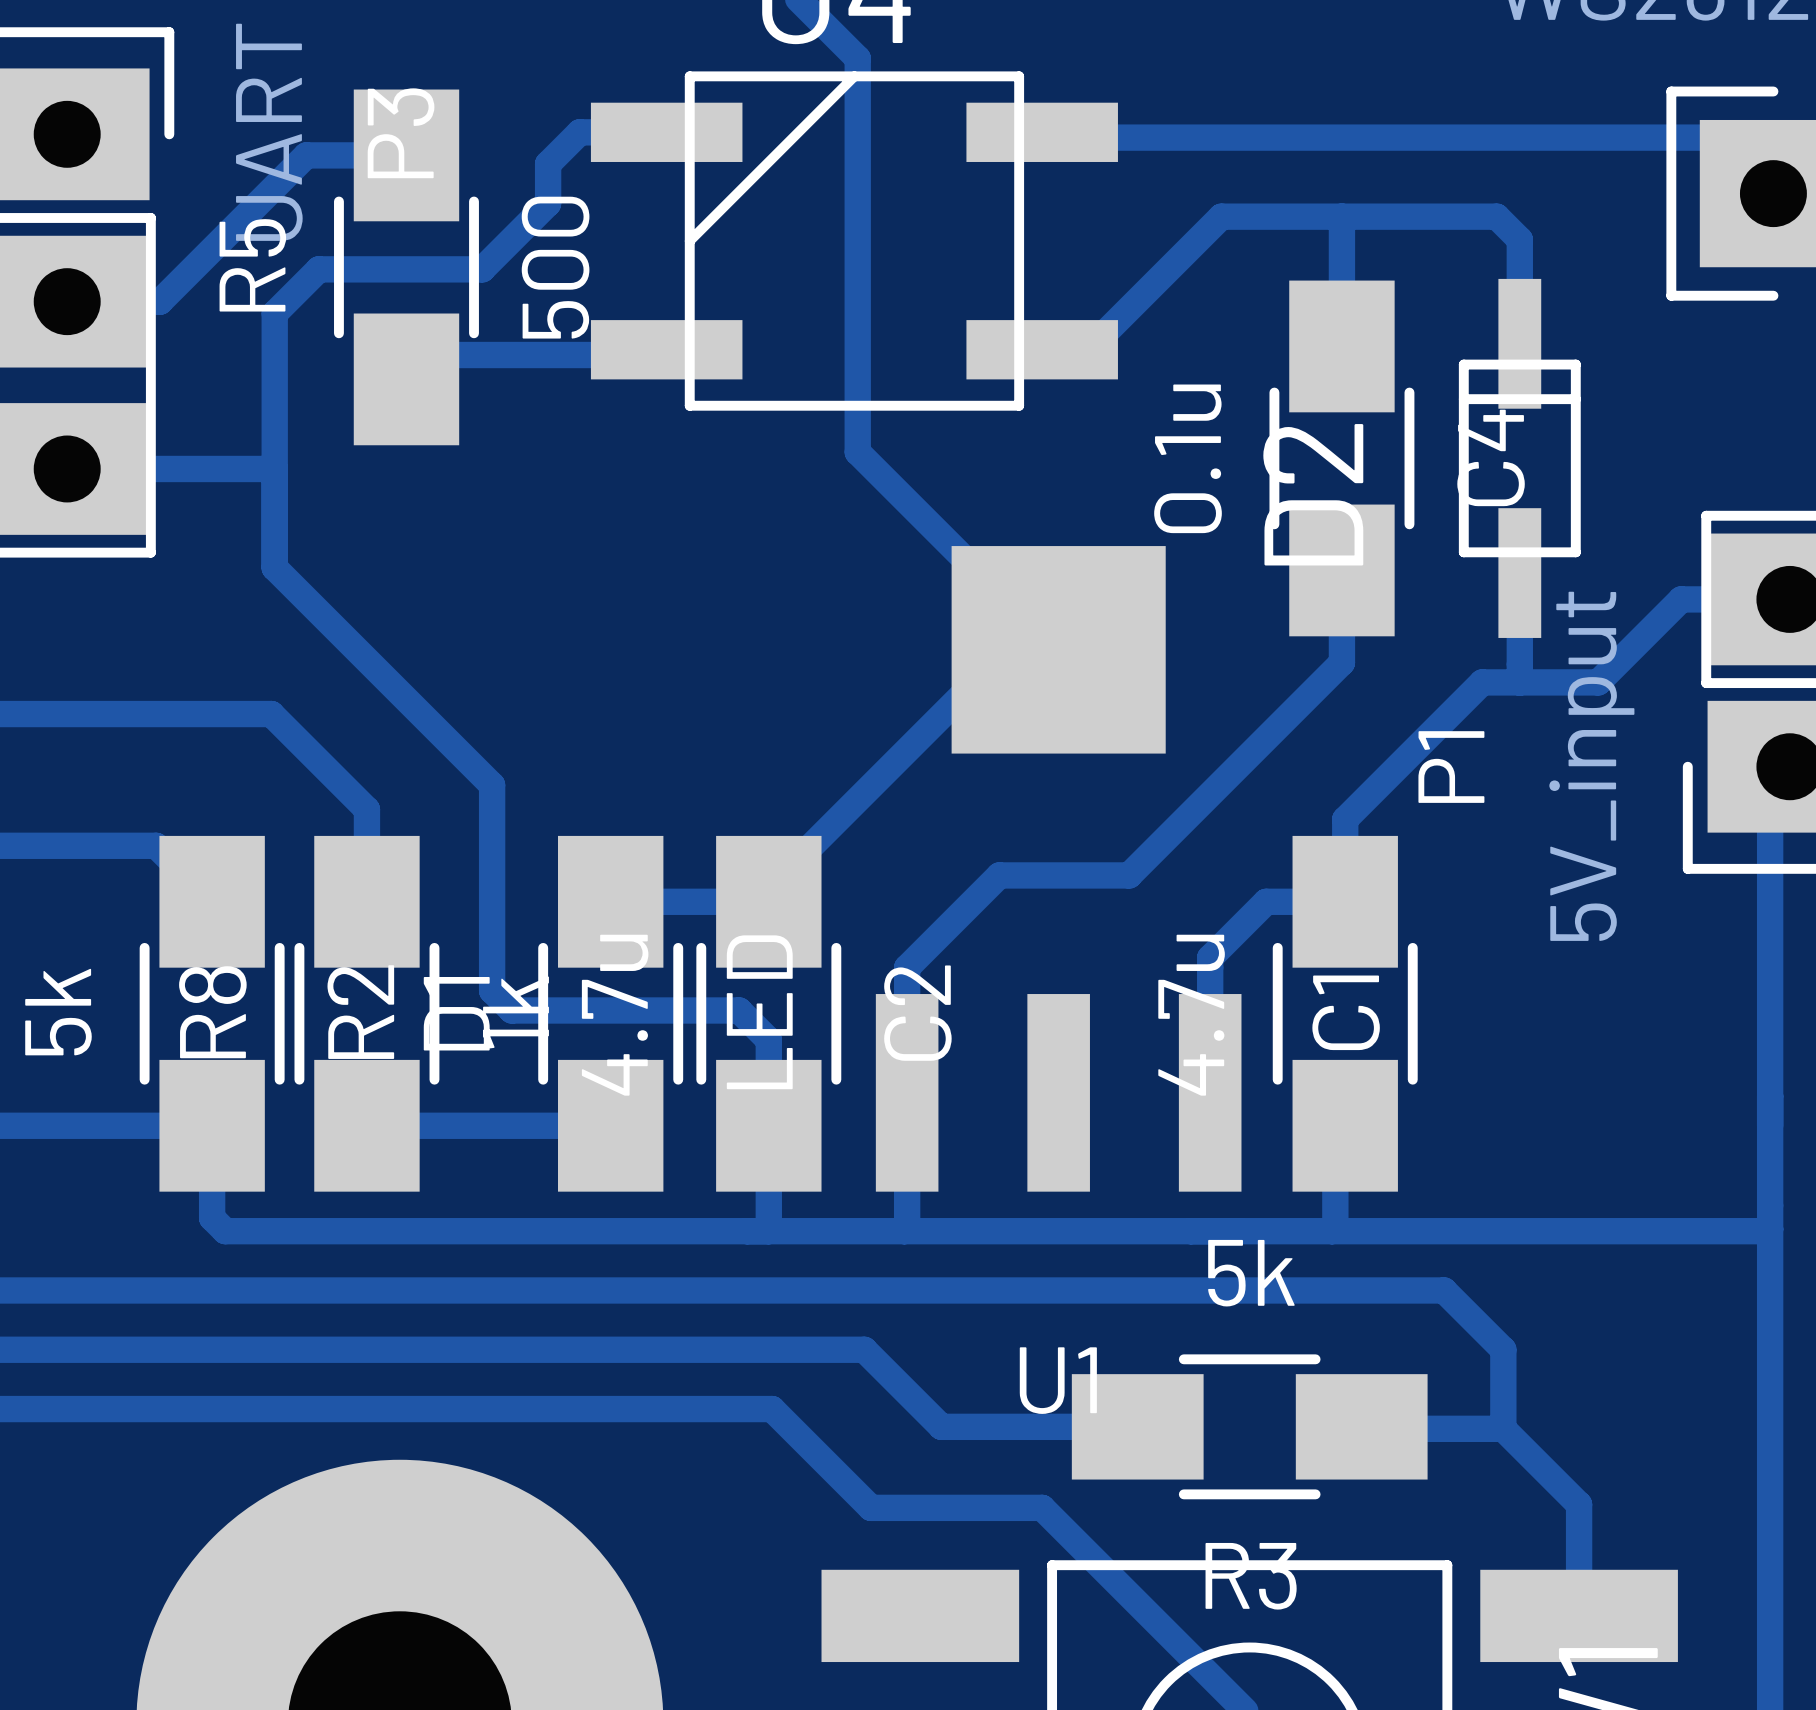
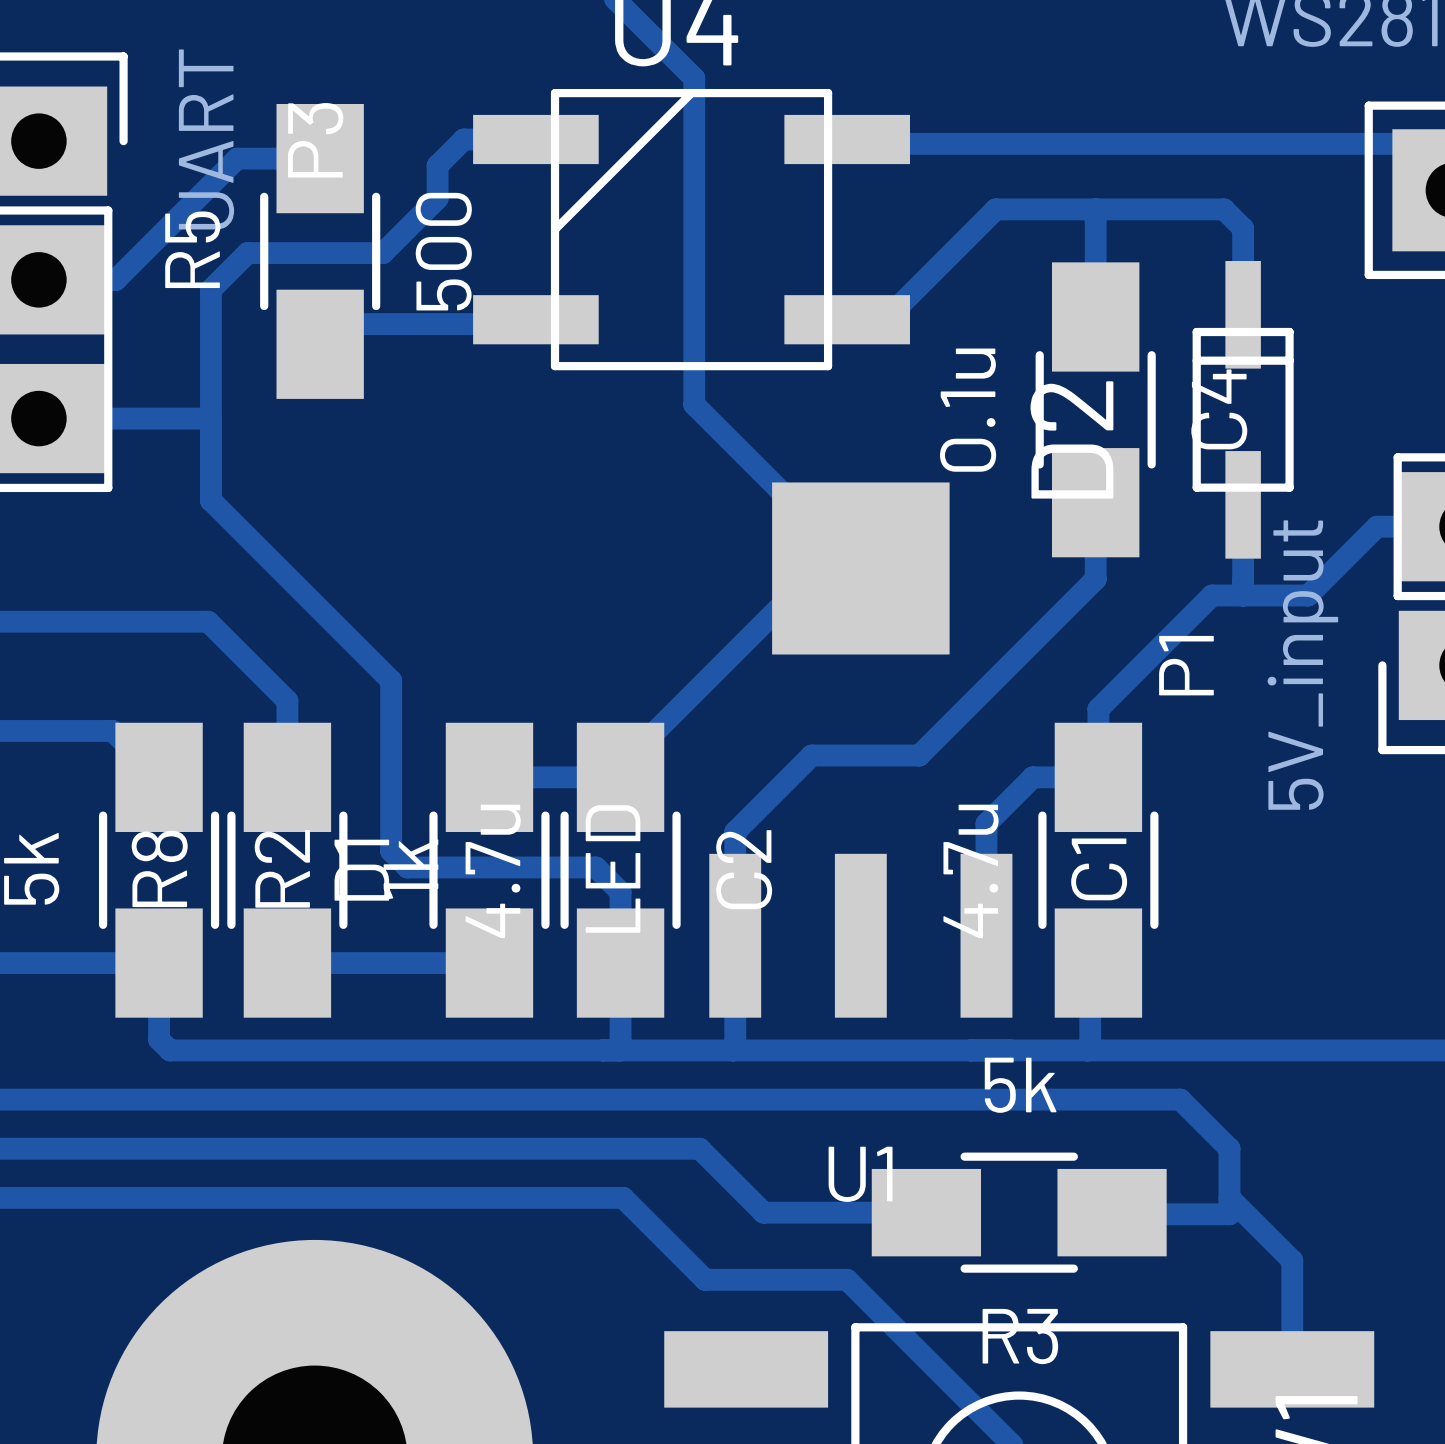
track: (1503, 1428) (1579, 1504) -> (1229, 1197) (1292, 1260) (1292, 1277)

